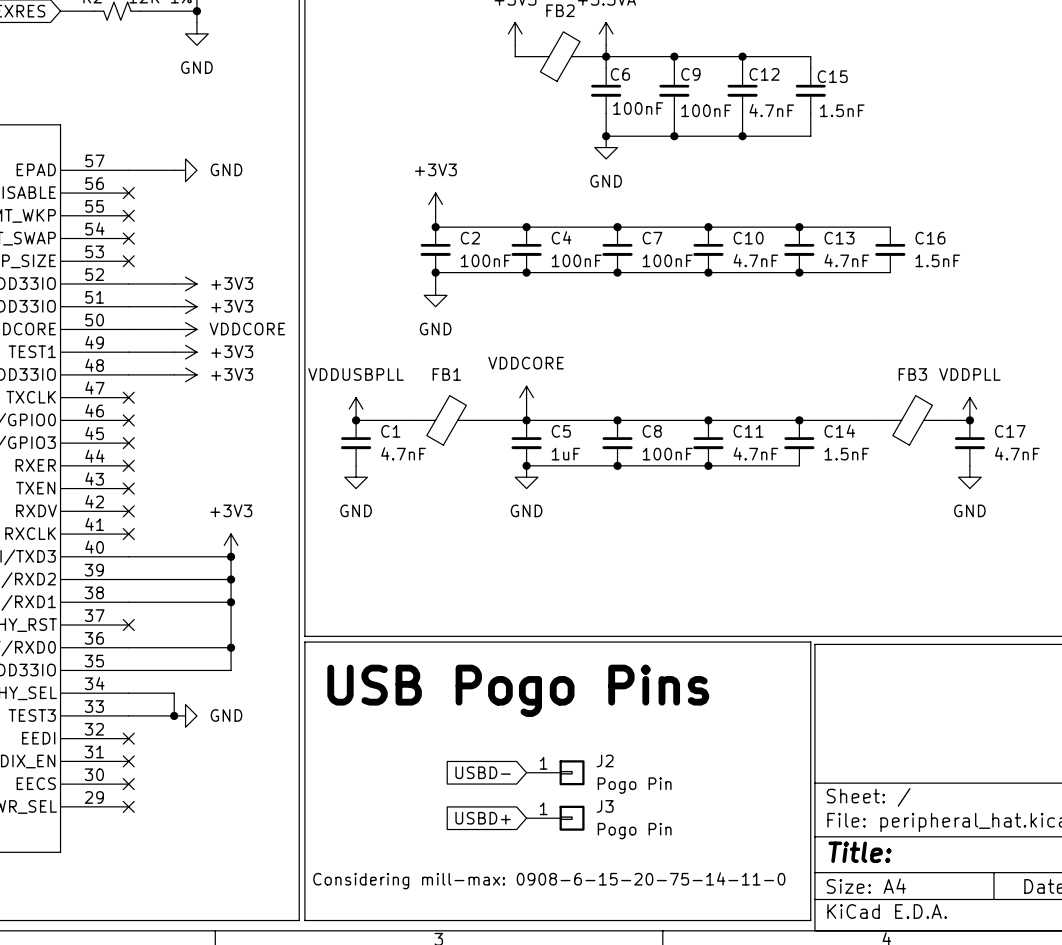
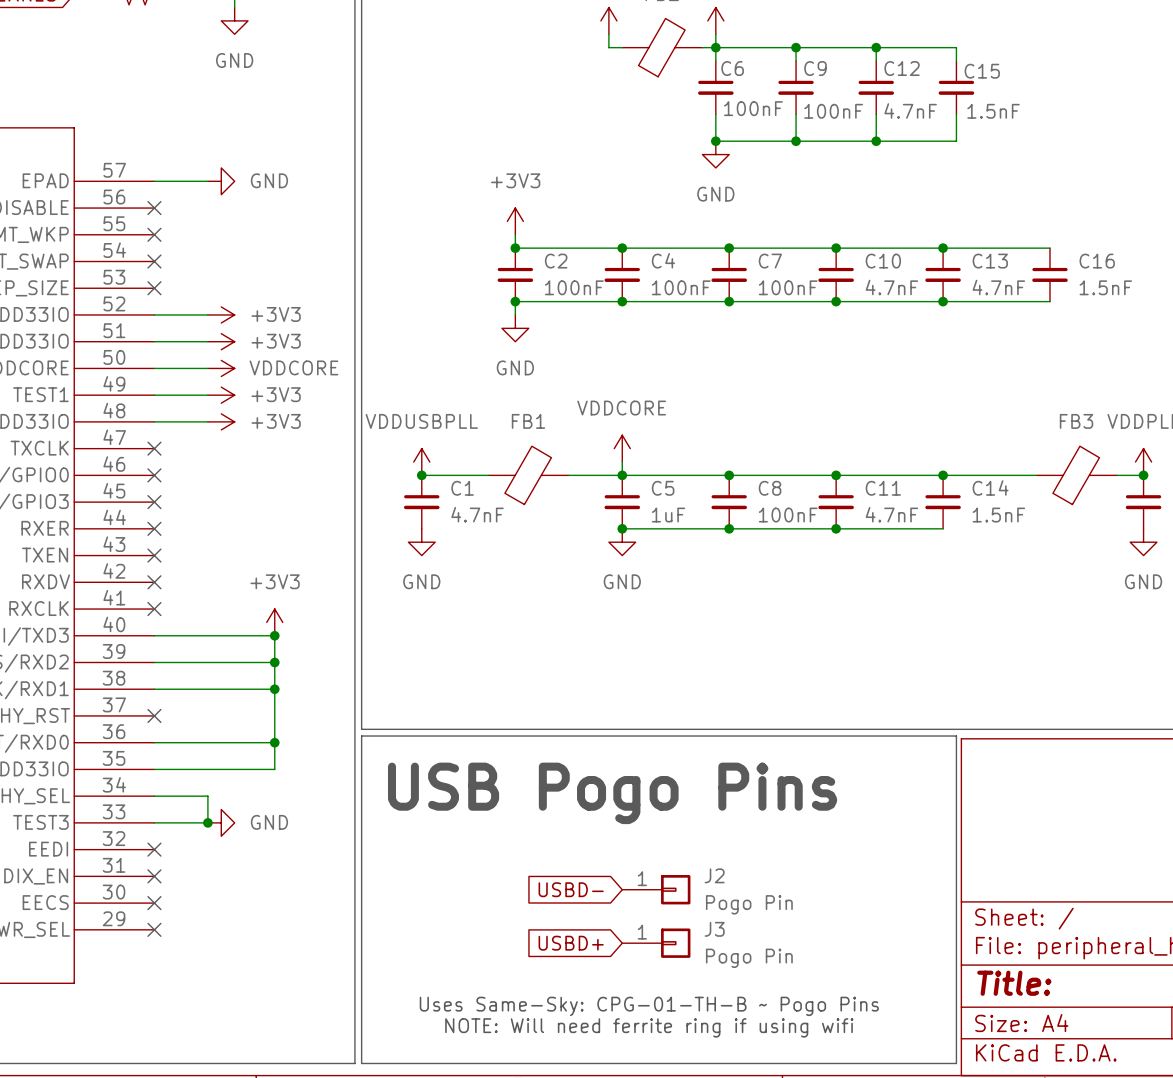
text: none -> Uses Same-Sky: CPG-01-TH-B ~ Pogo Pins (649, 1006)
text: Considering mill-max: 0908-6-15-20-75-14-11-0 (549, 880) -> none
text: none -> NOTE: Will need ferrite ring if using wifi (649, 1027)

